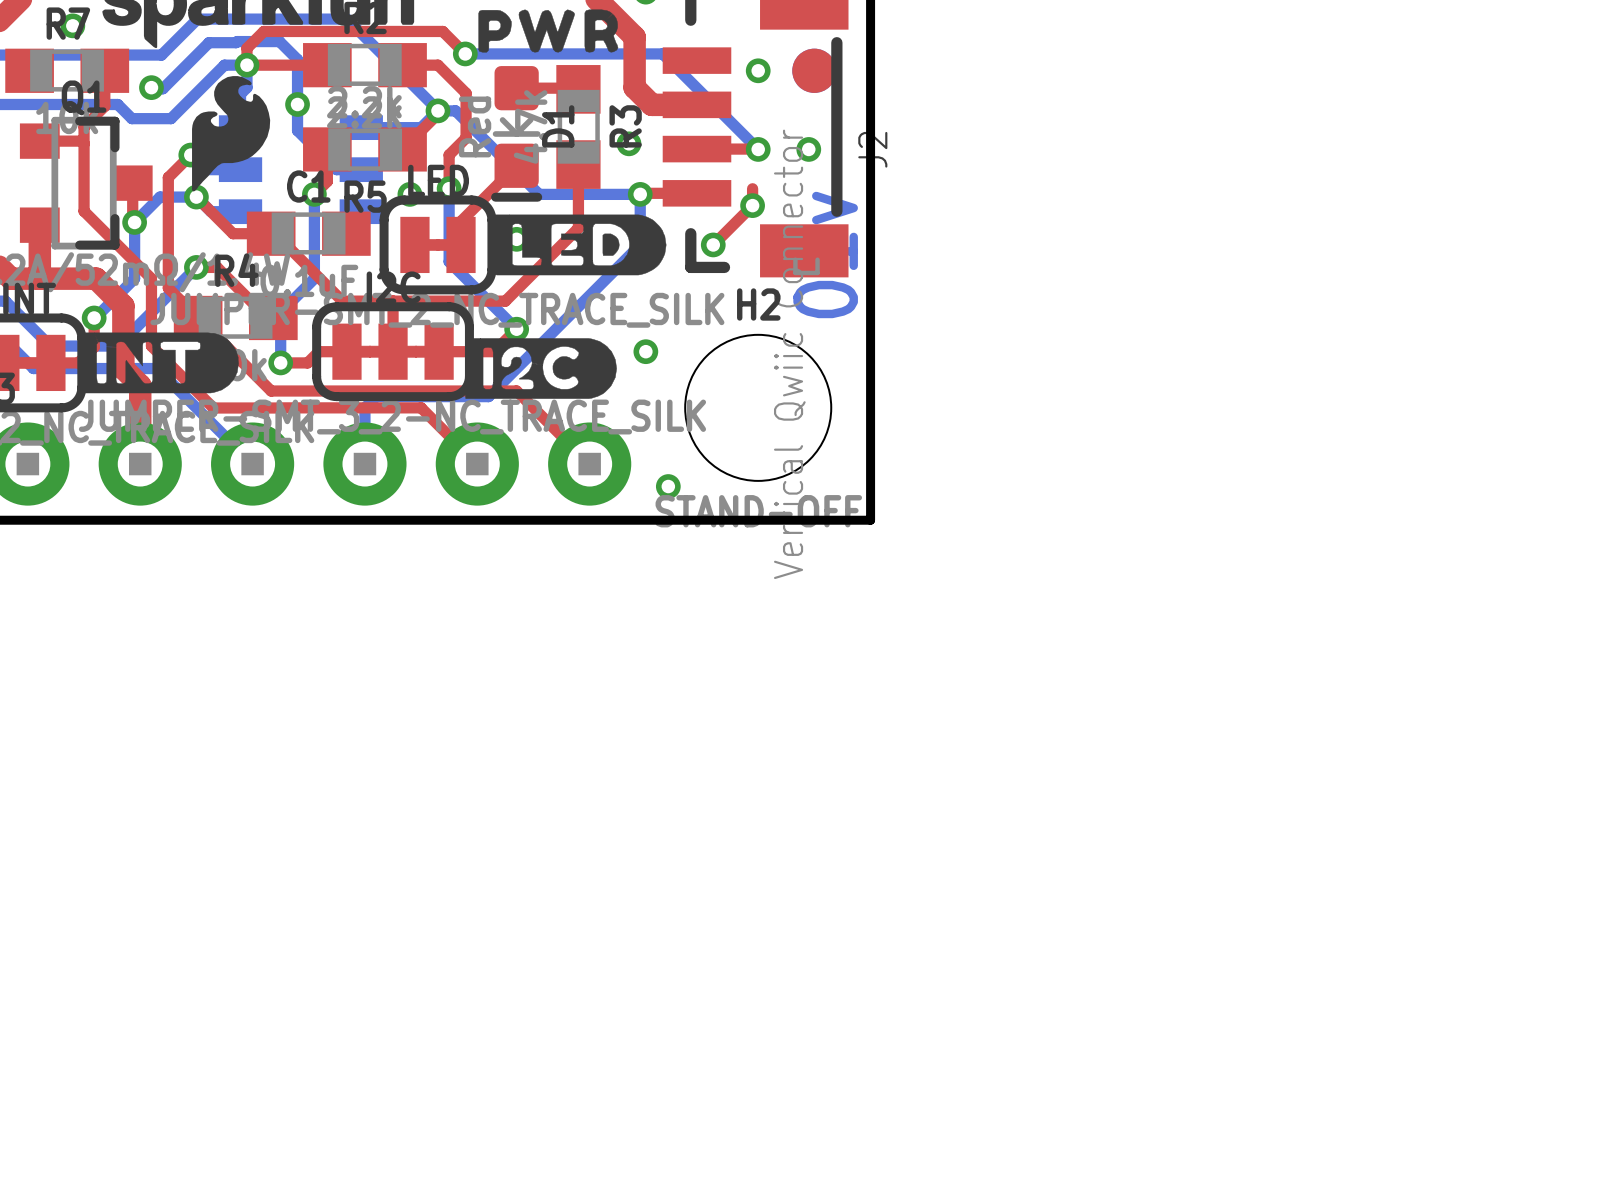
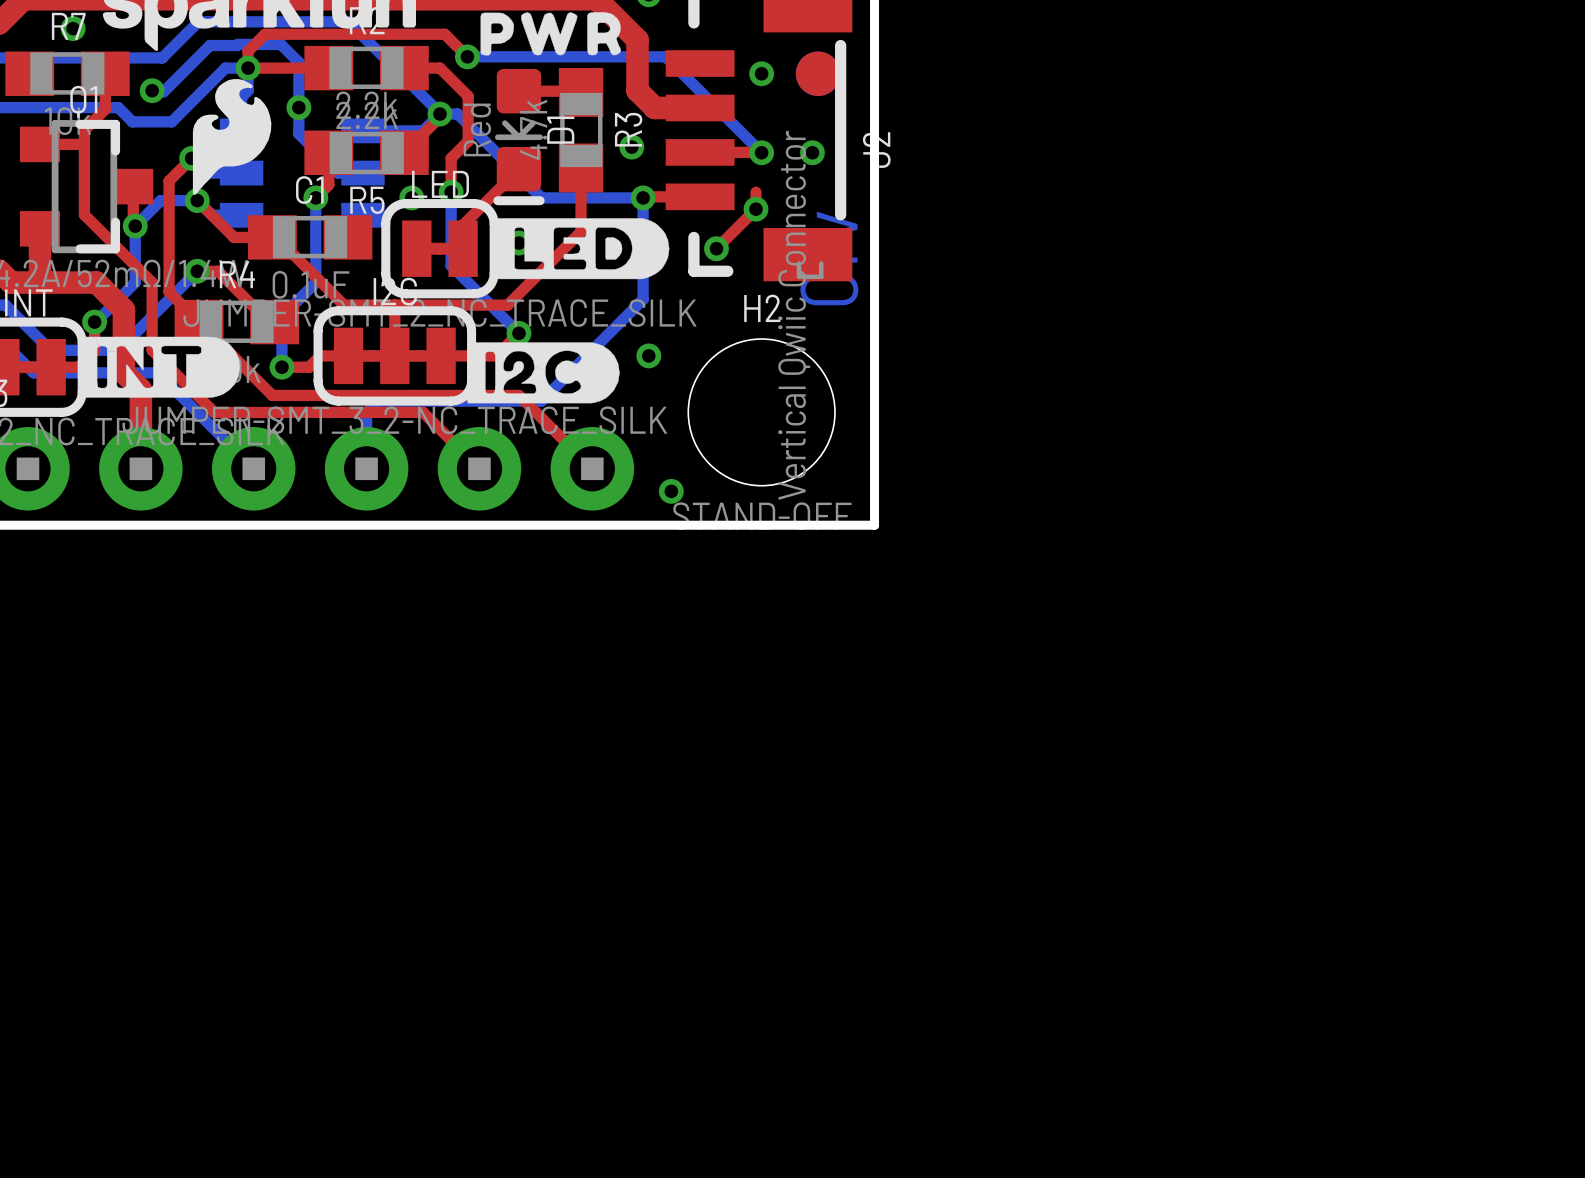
bottom track: (640, 244) (488, 396) -> (643, 248) (643, 299) (541, 401) (490, 401)

